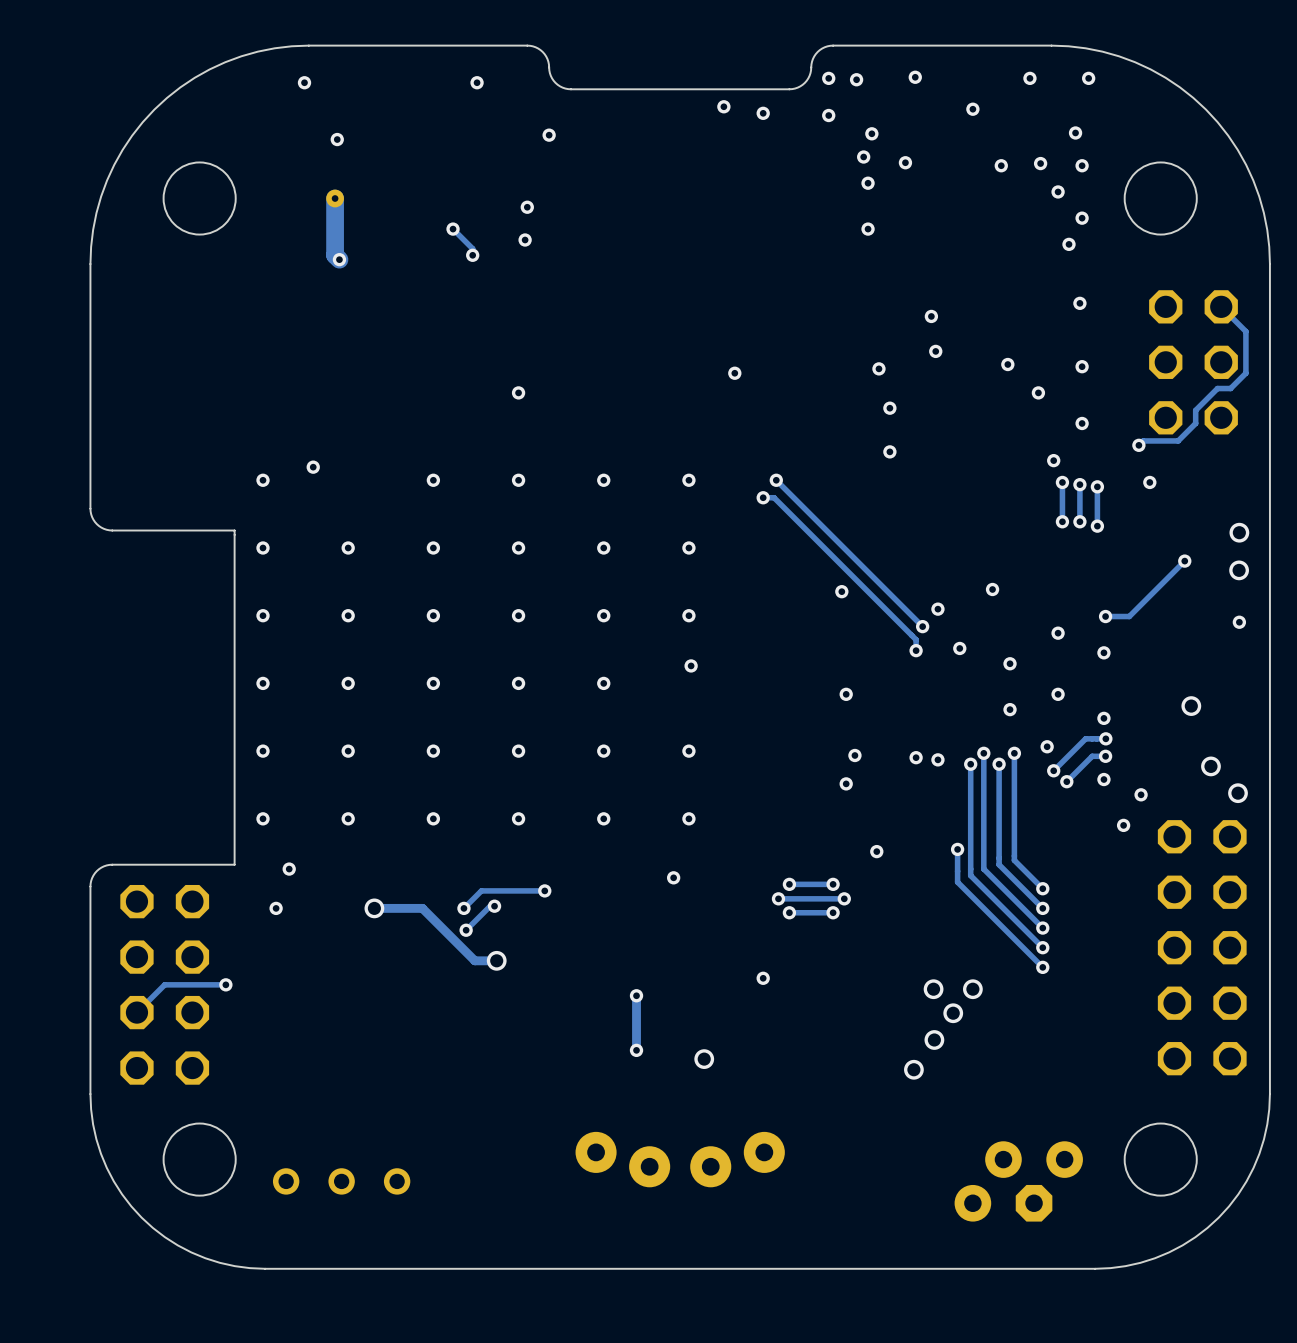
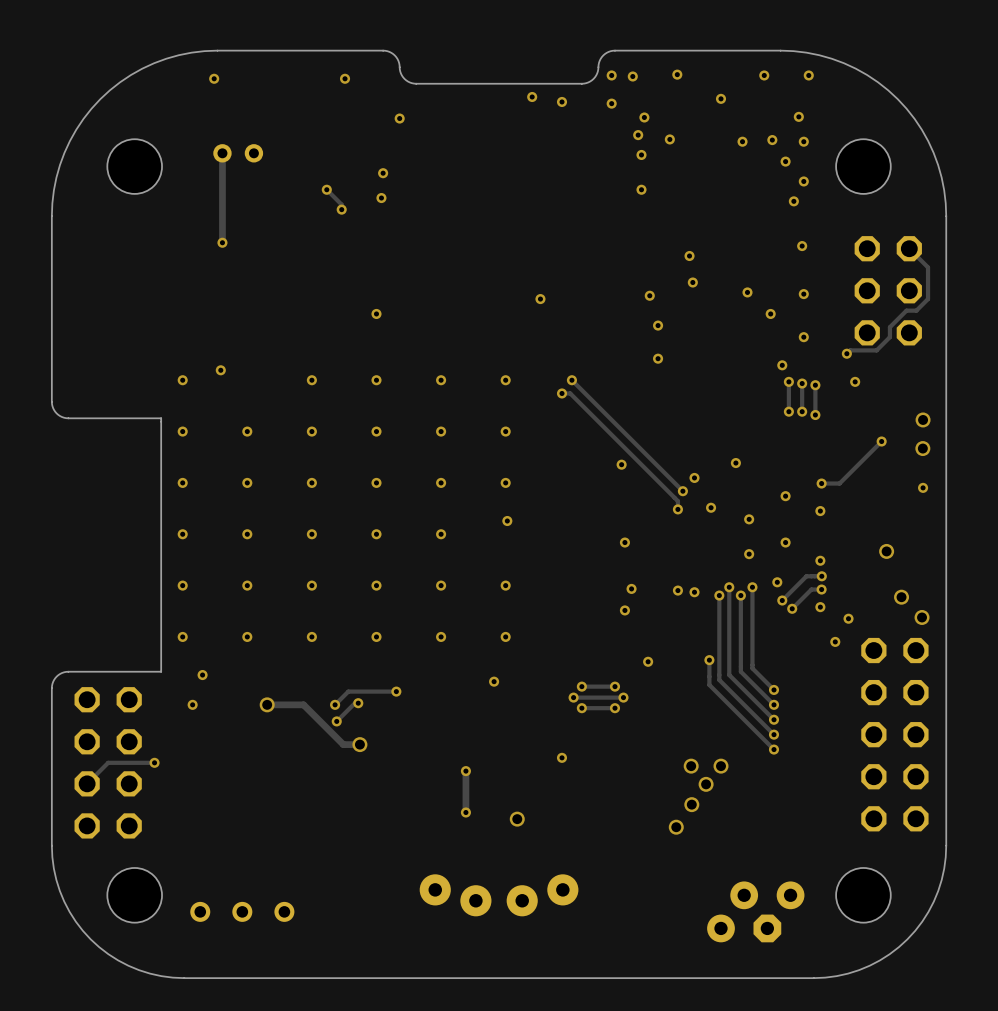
via: (337, 139) -> none
track: none -> (222, 153) (222, 242)
part footprint: [326, 189, 344, 208] -> [213, 144, 264, 163]
track: (335, 198) (335, 255) (339, 259) -> none
via position: (339, 259) -> (222, 242)

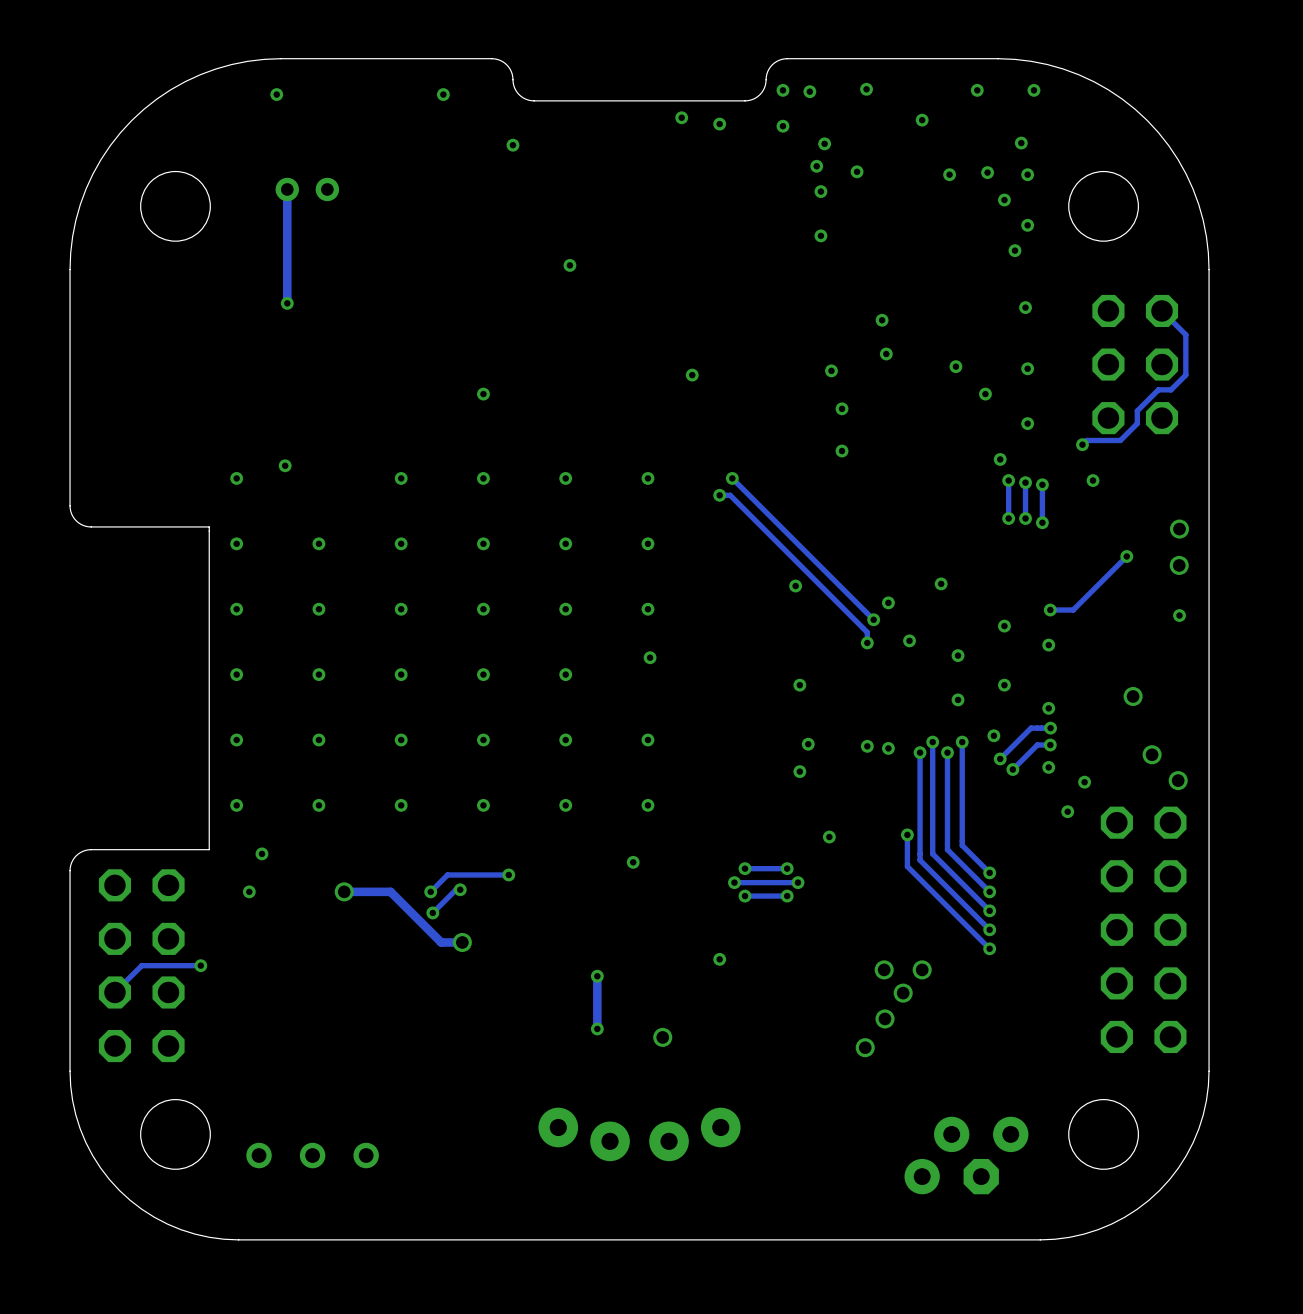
via: (383, 173) -> none
track: (326, 189) (341, 204) (341, 209) (343, 207) -> none
via: (326, 189) -> none
via: (381, 198) -> none
via: (341, 209) -> none
via: none -> (569, 265)

